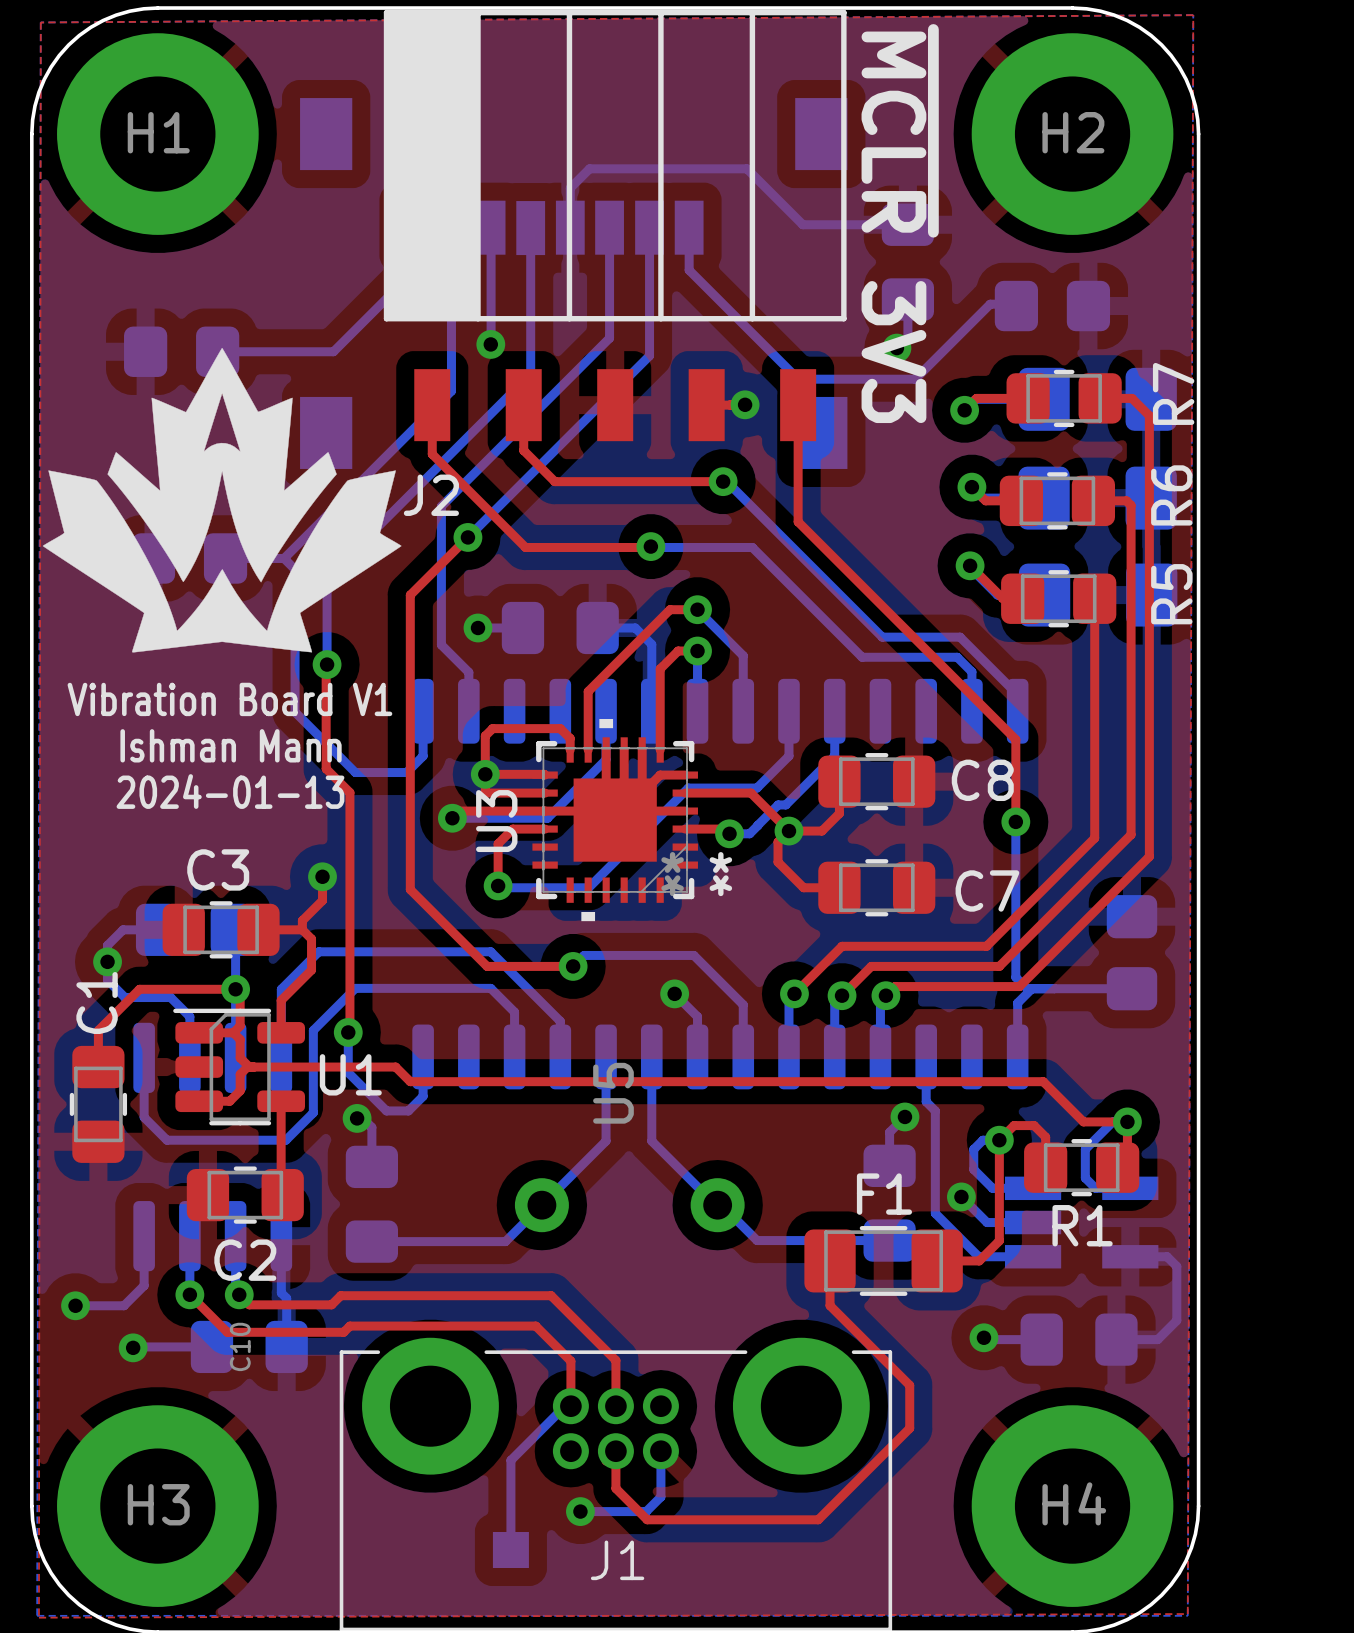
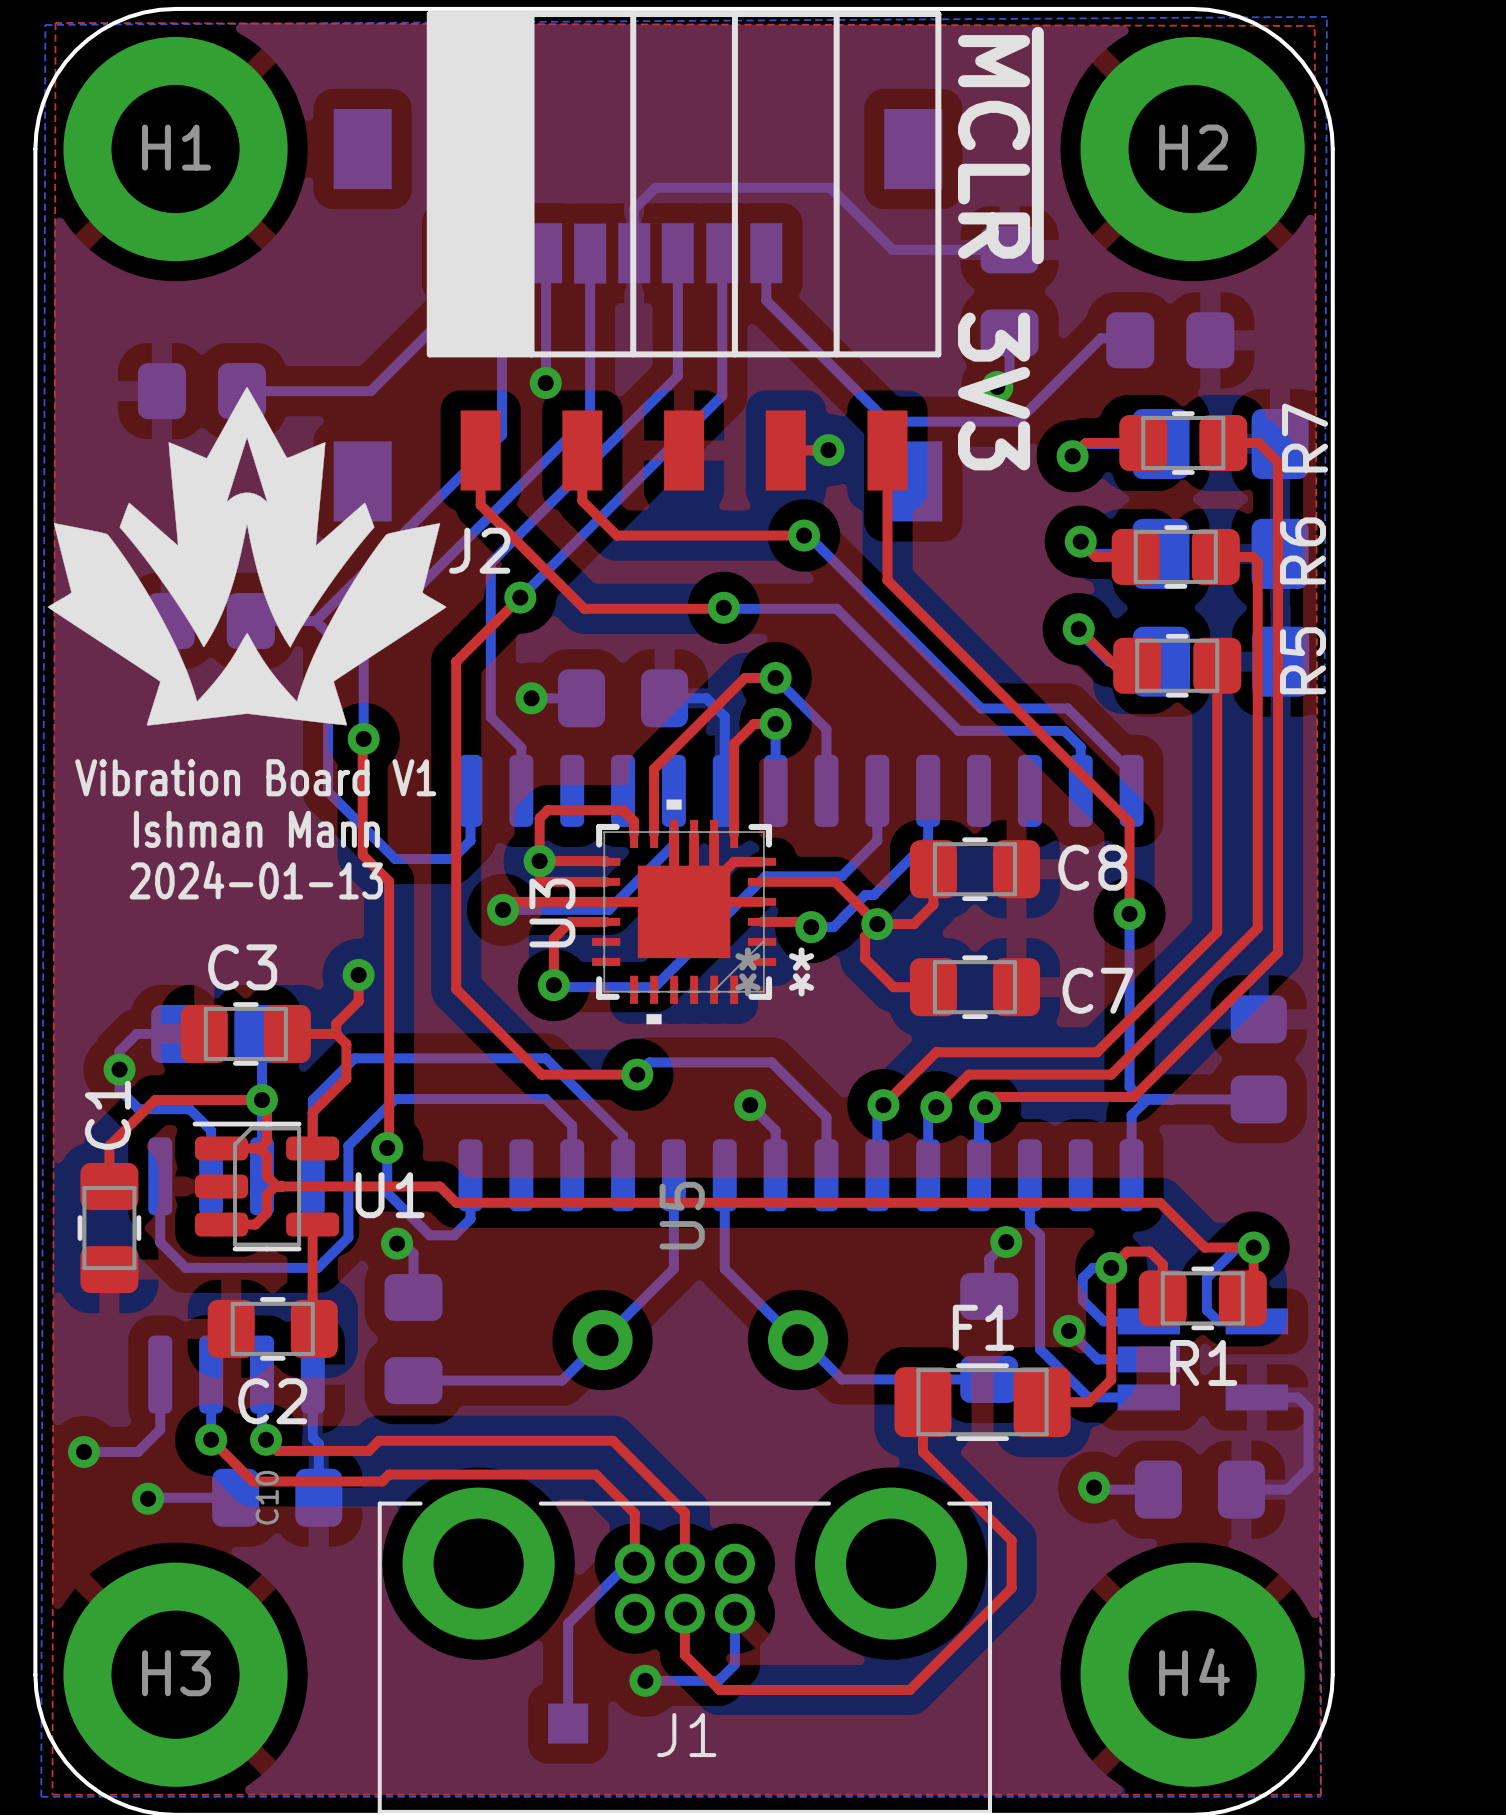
top zone outline: (1193, 15) (1187, 1614) (38, 1617) (40, 22) (1193, 15) -> (55, 22) (52, 1794) (1320, 1794) (1314, 26) (55, 22)

